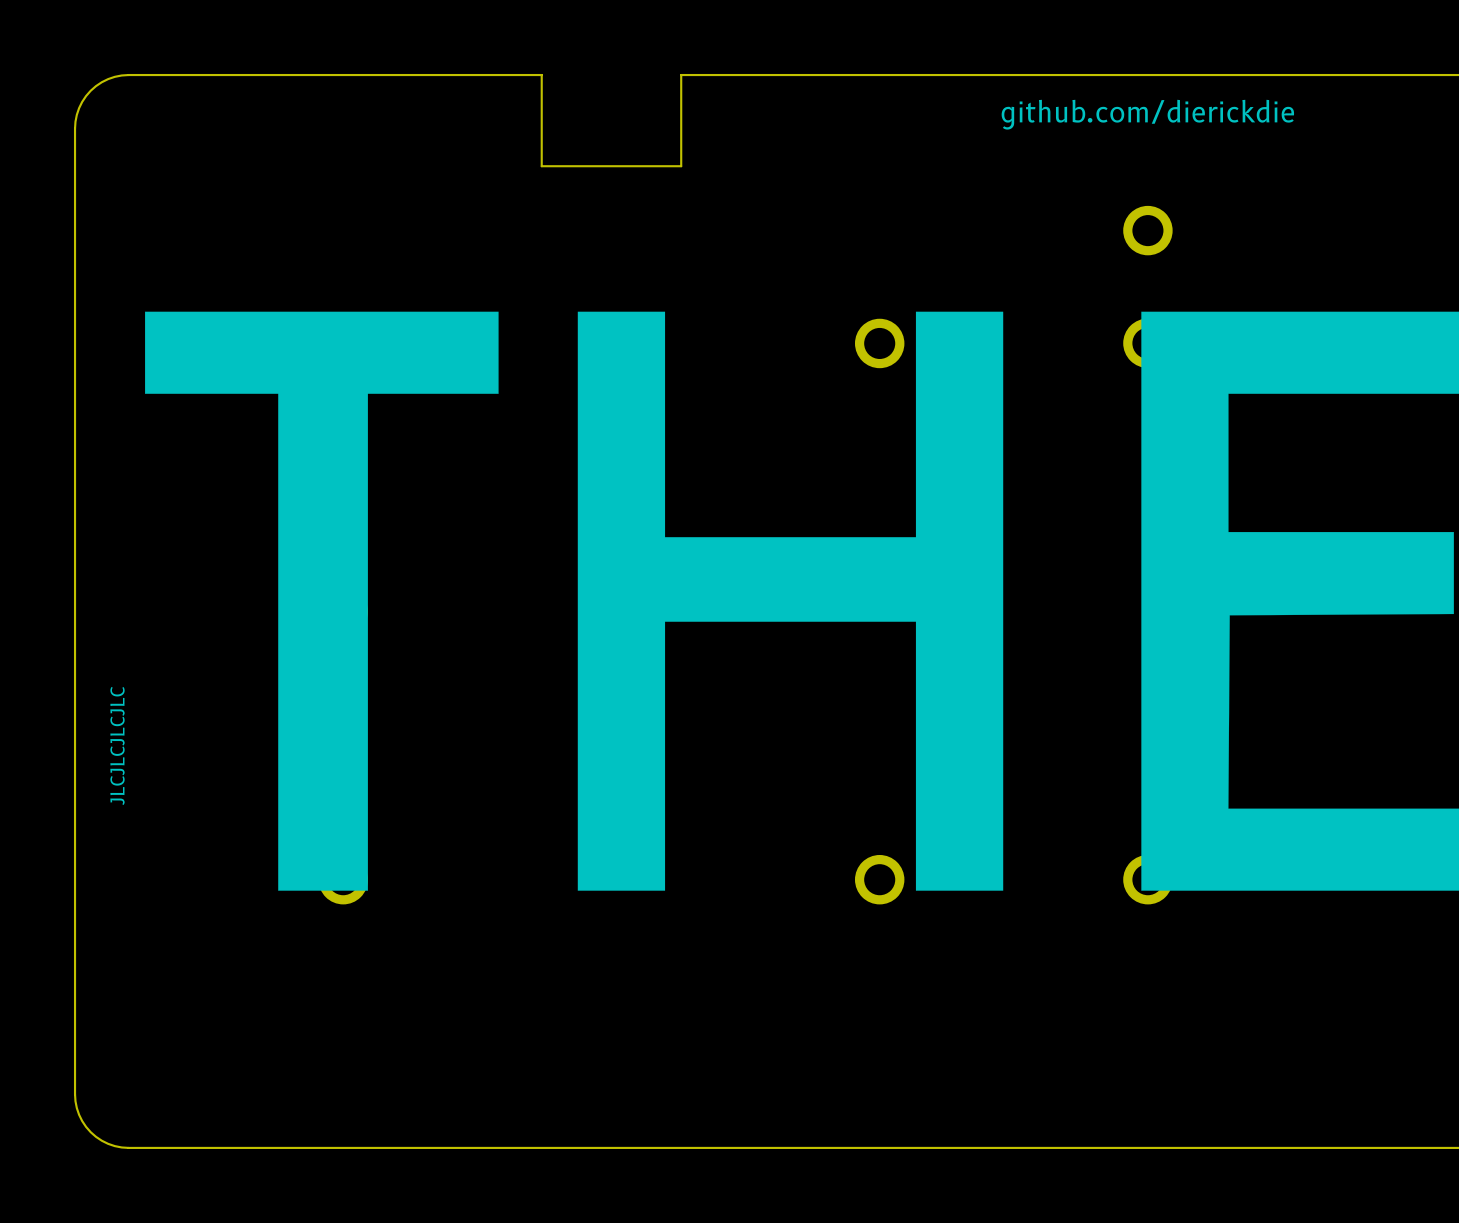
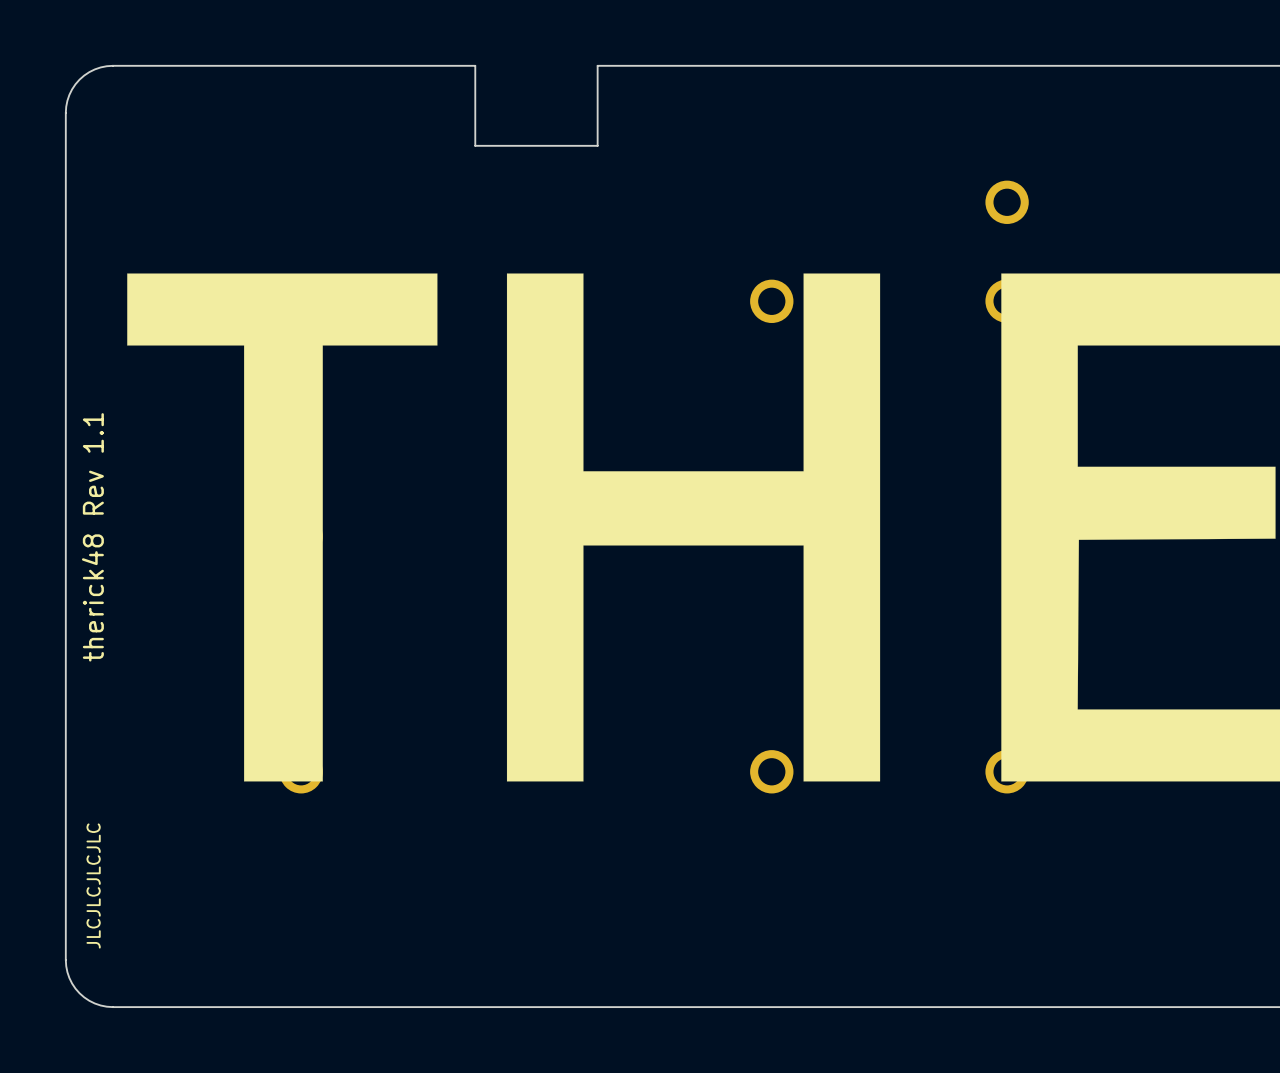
text: github.com/dierickdie (1147, 114) -> none
text: none -> therick48 Rev 1.1 (92, 537)
text position: JLCJLCJLCJLC (117, 745) -> JLCJLCJLCJLC (93, 886)

